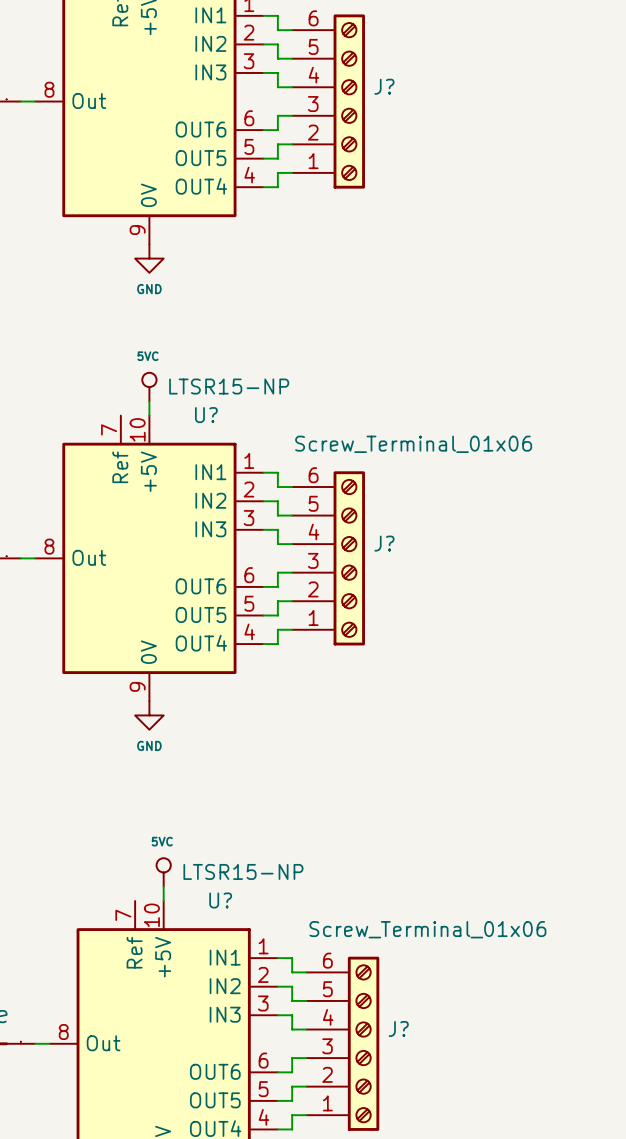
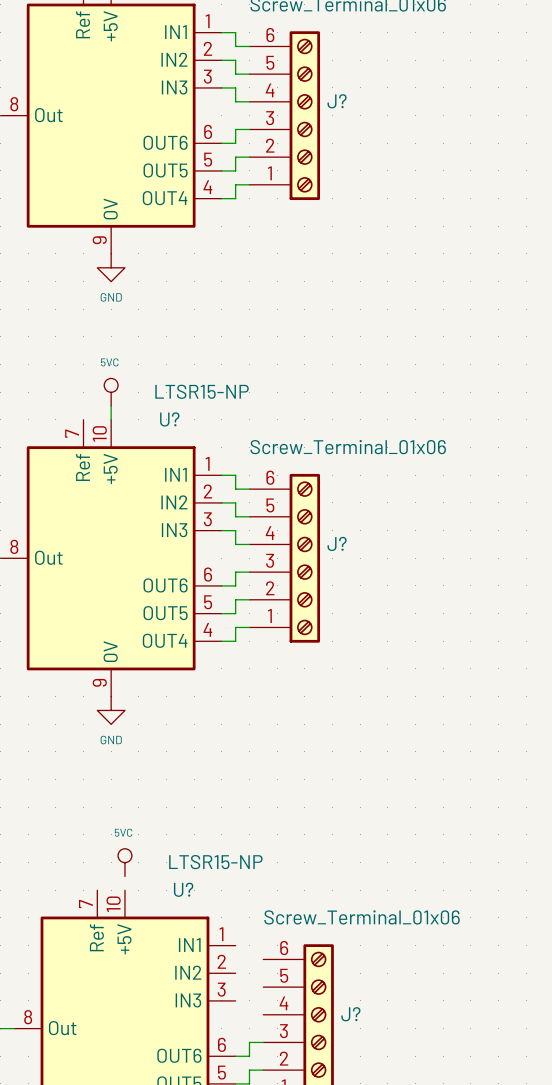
wire: (163, 886) (163, 901) -> none
wire: (277, 958) (292, 958) (292, 972) (306, 972) -> none
wire: (277, 986) (292, 986) (292, 1000) (306, 1000) -> none
wire: (277, 1015) (292, 1015) (292, 1029) (306, 1029) -> none

